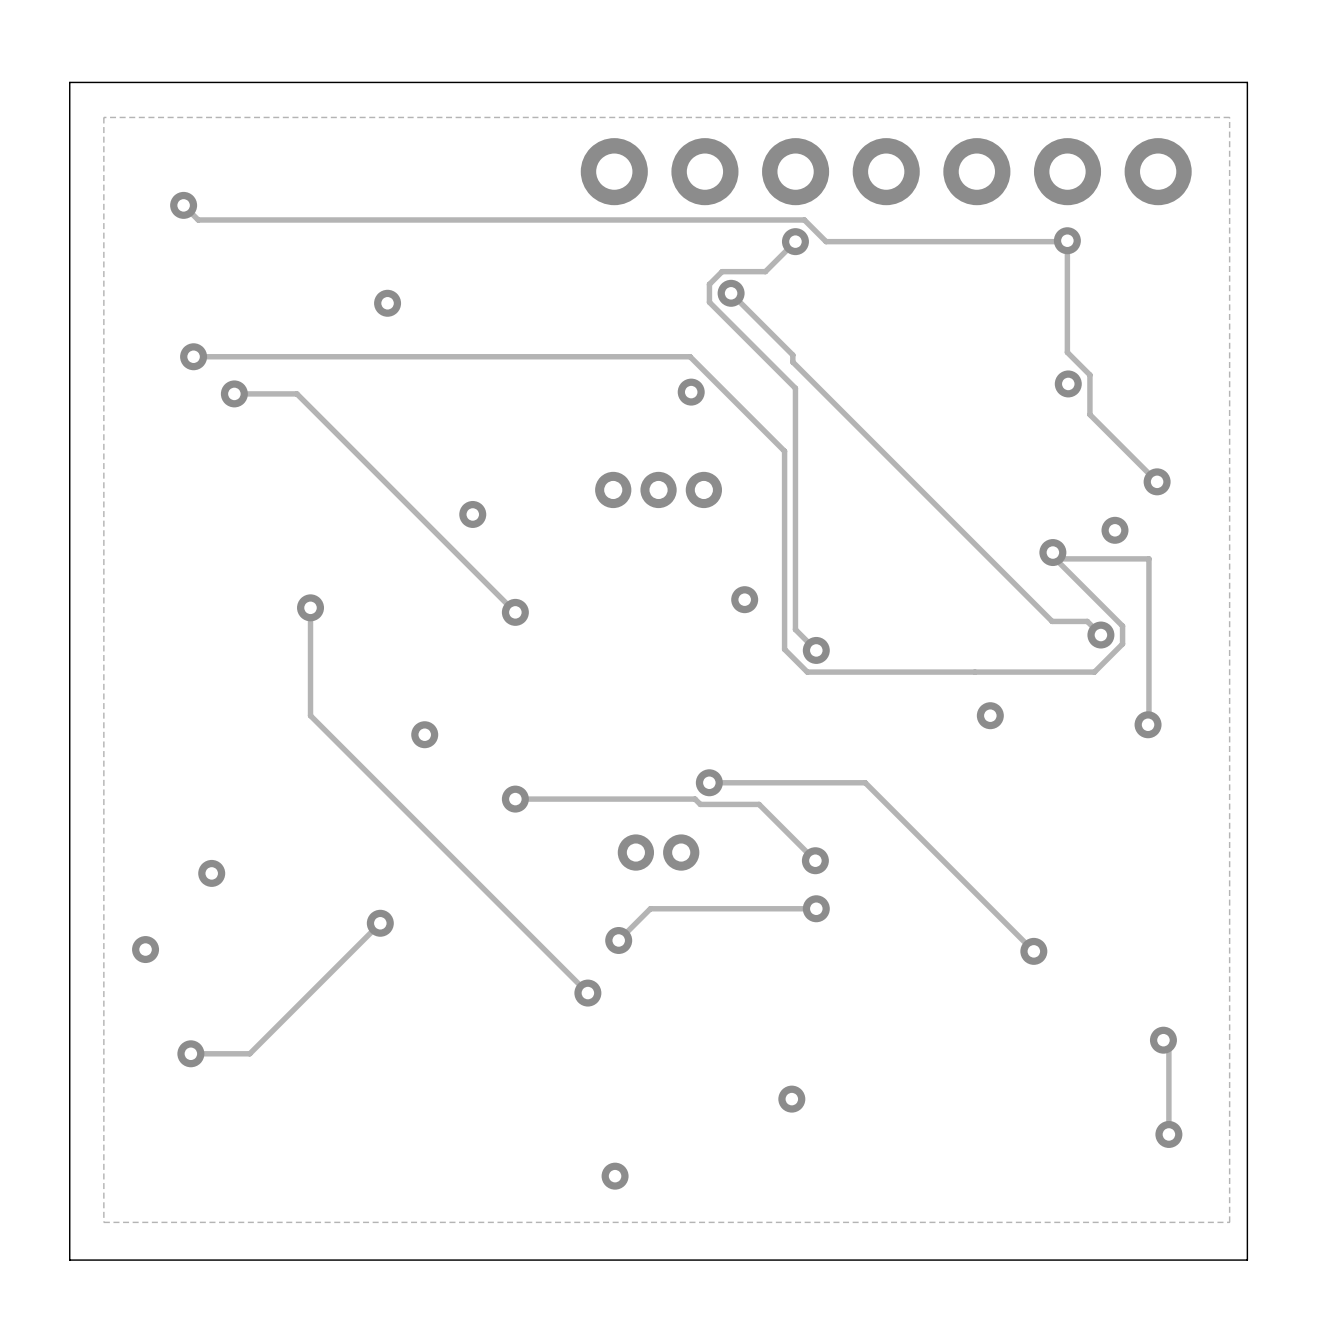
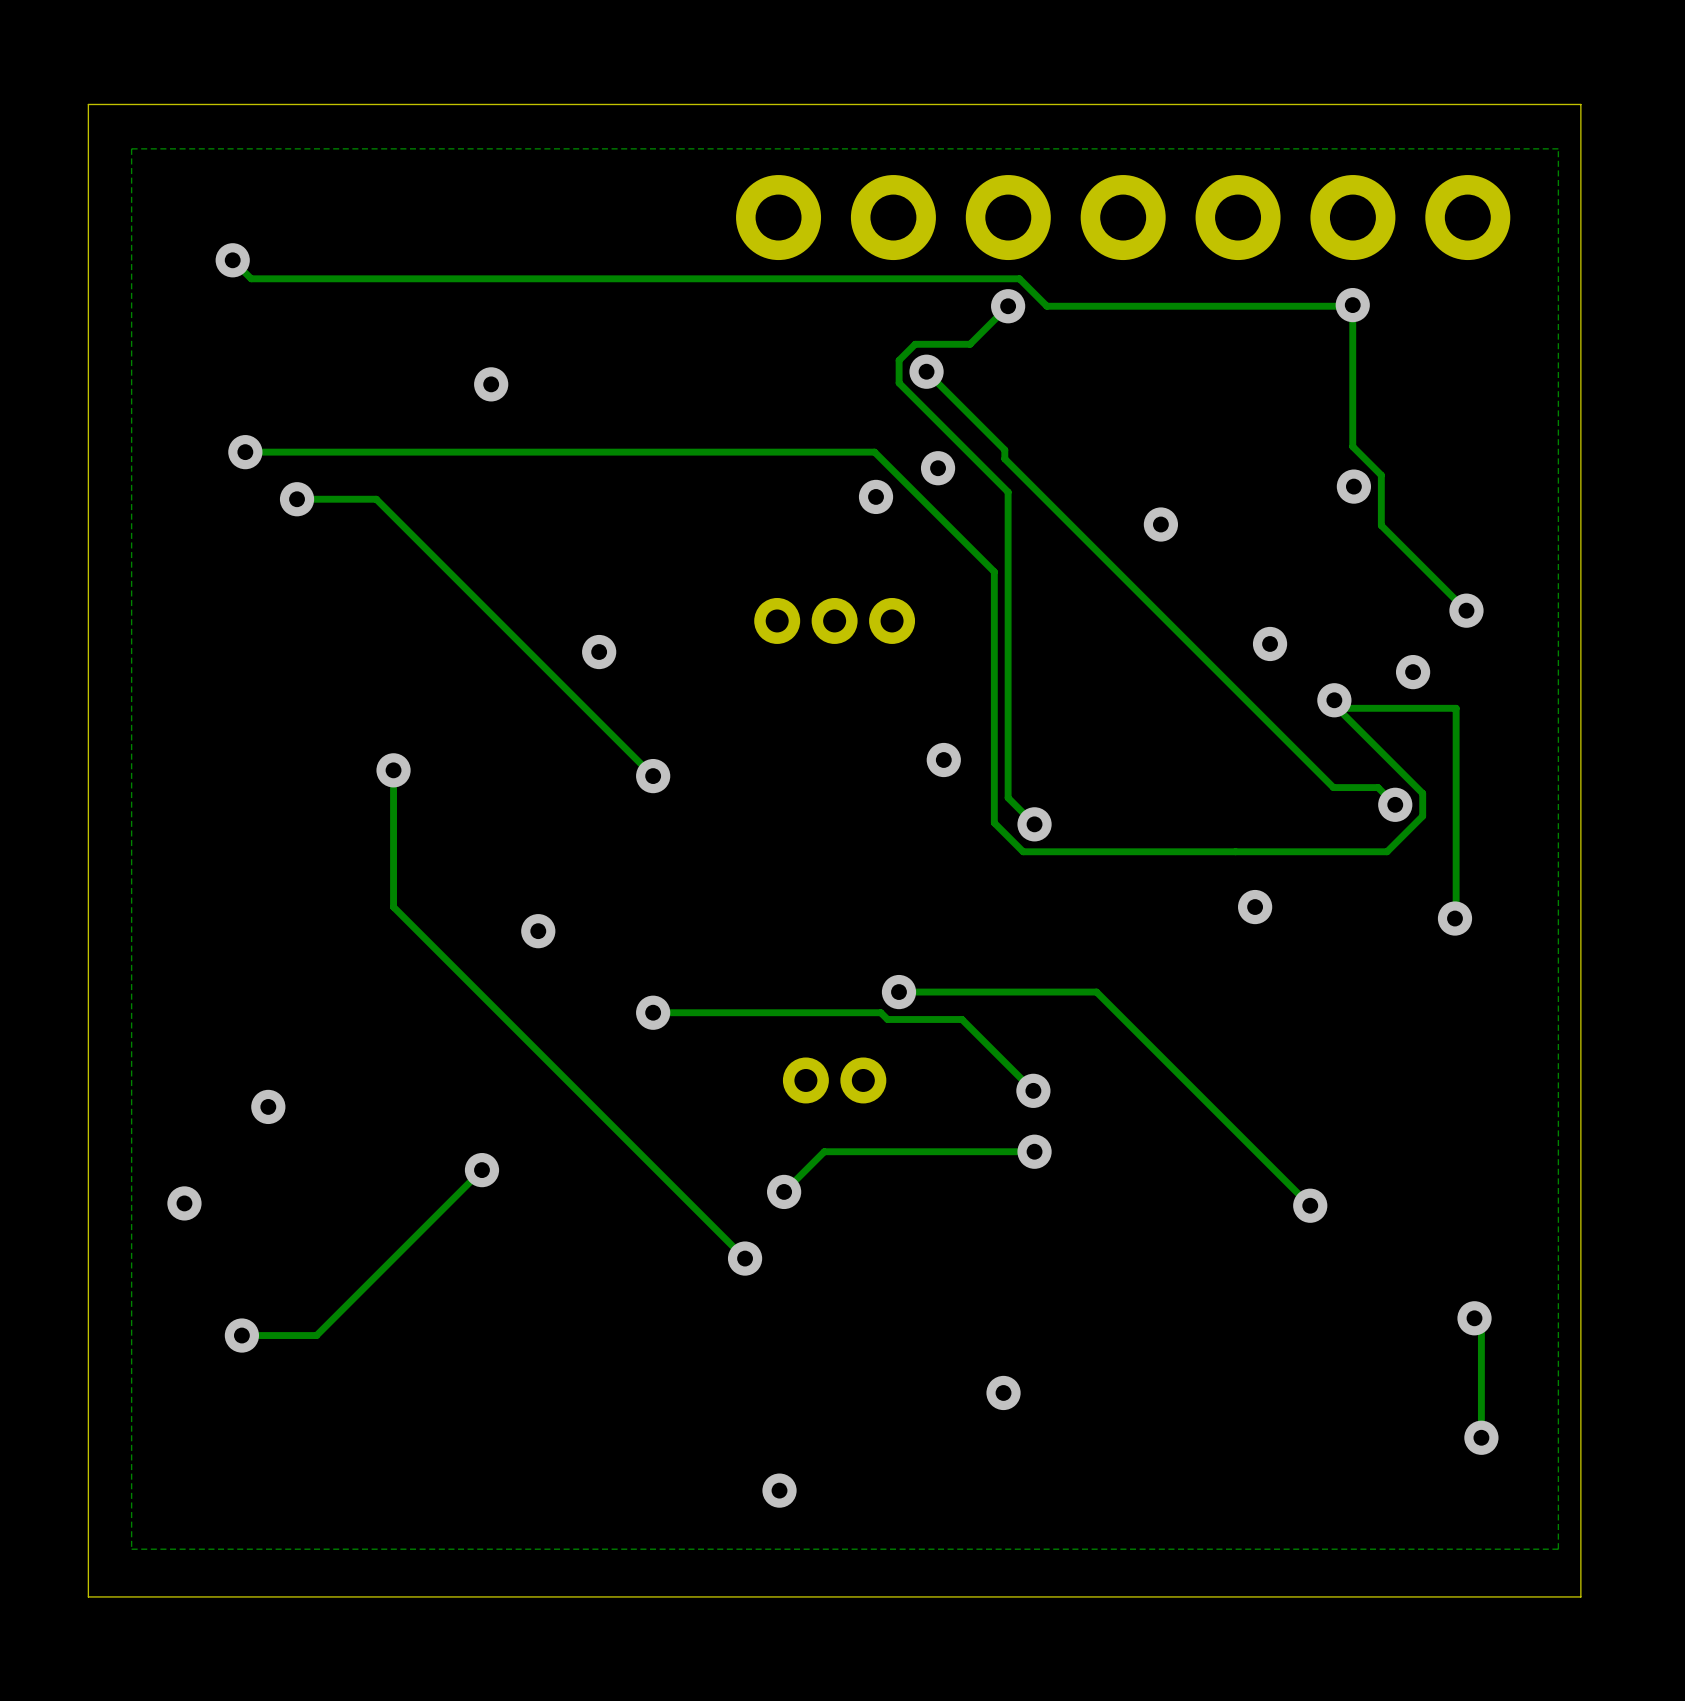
via: none -> (938, 468)
via: none -> (1160, 524)
via: none -> (1270, 643)

